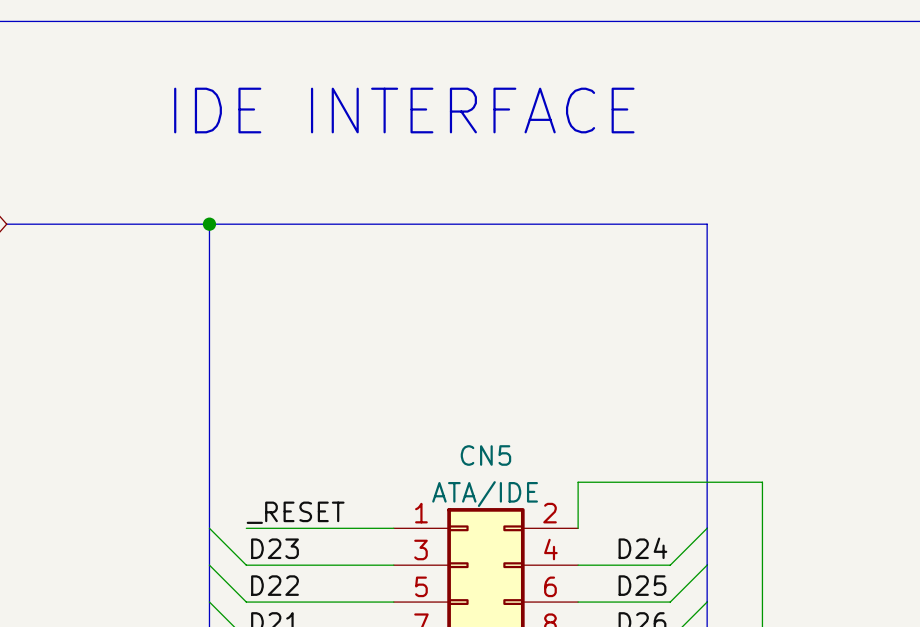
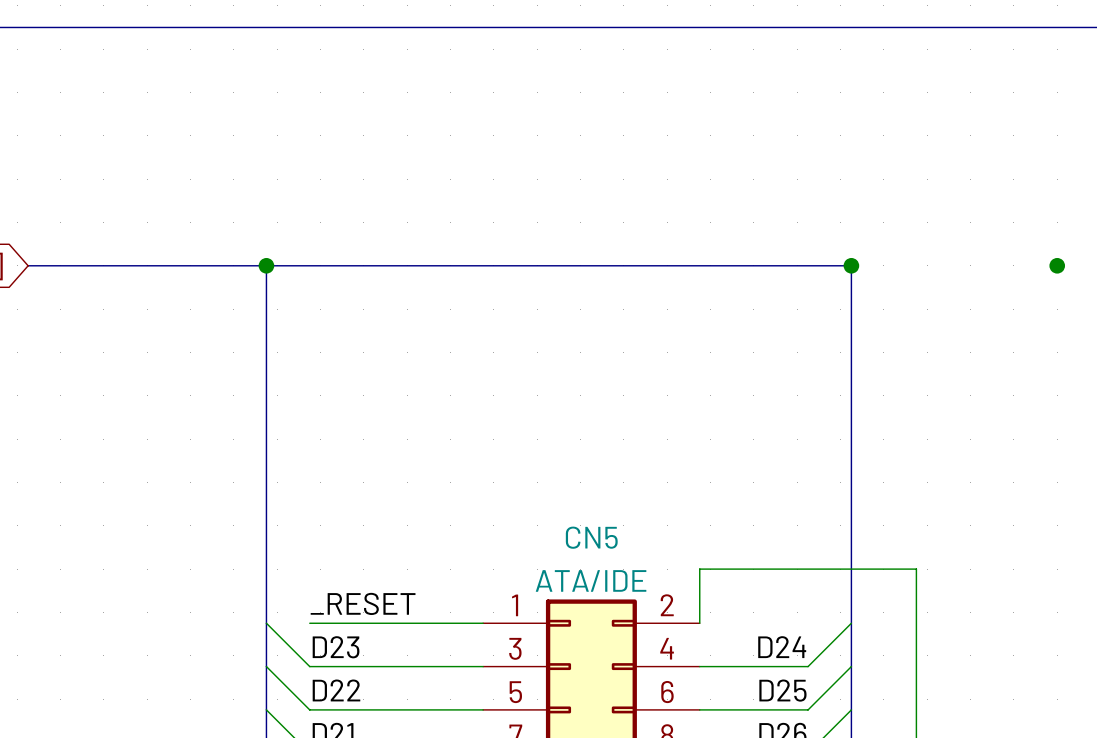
text: IDE INTERFACE (404, 110) -> none
junction: none -> (851, 265)
junction: none -> (1057, 265)

